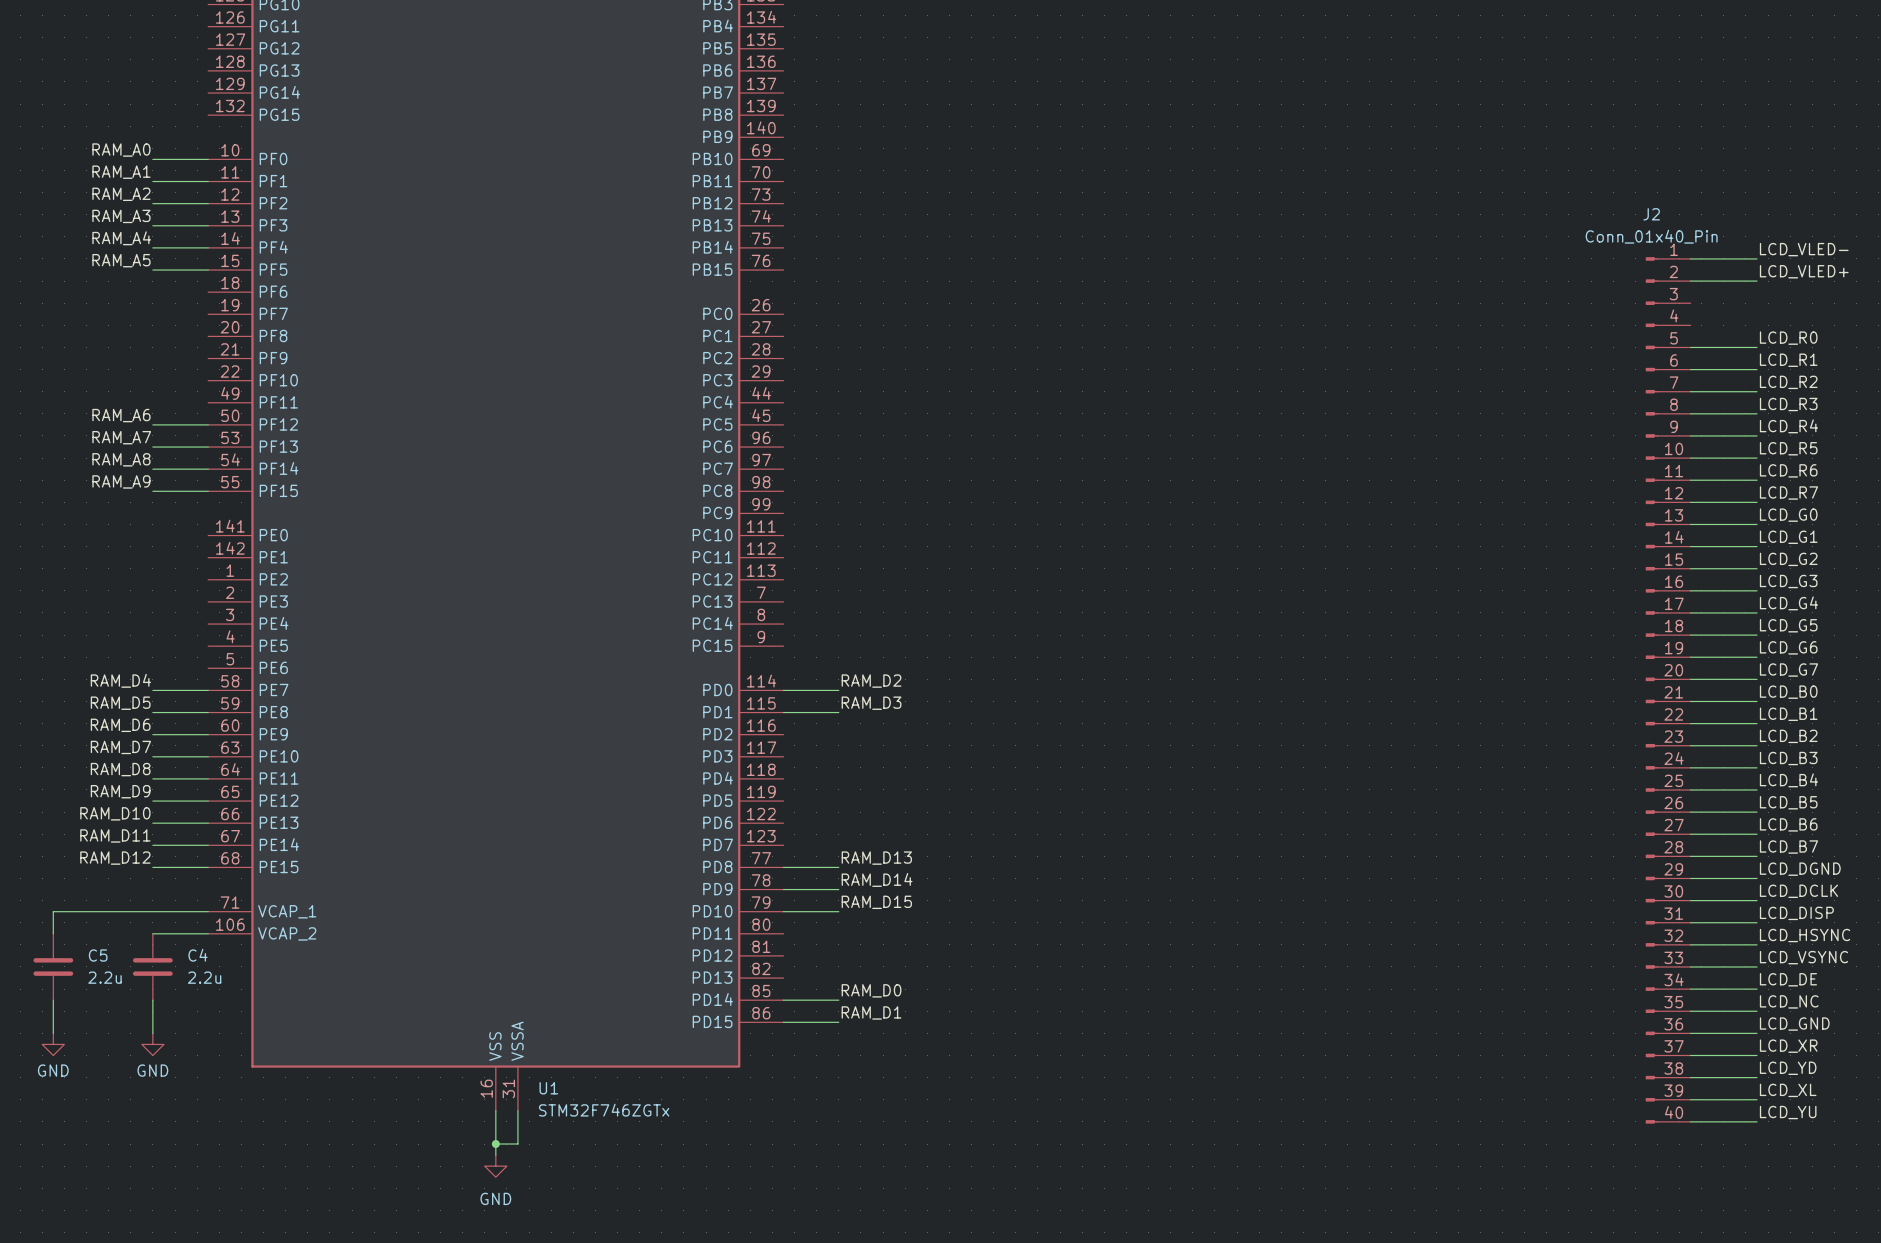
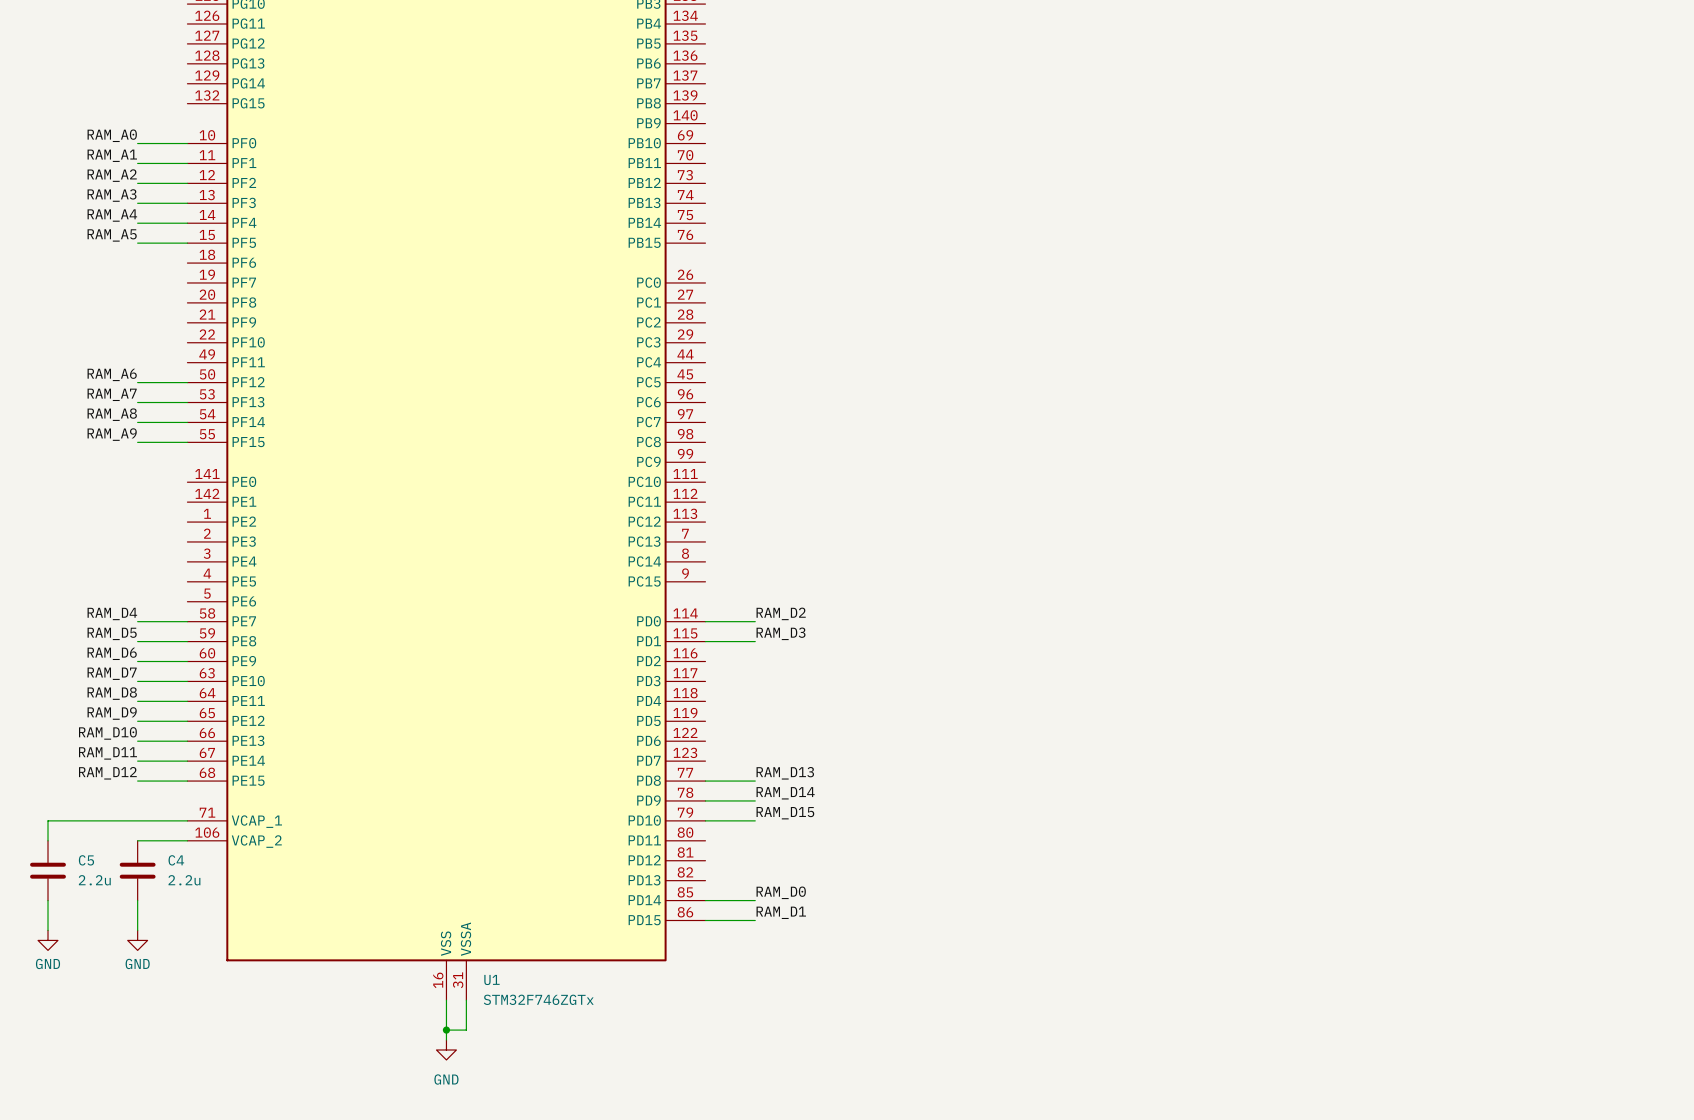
label: LCD_VLED- (1804, 249) -> none
wire: (1690, 258) (1757, 258) -> none
label: LCD_VLED+ (1804, 271) -> none
wire: (1690, 281) (1757, 281) -> none
label: LCD_R0 (1788, 338) -> none
wire: (1690, 347) (1757, 347) -> none
label: LCD_R1 (1788, 360) -> none
wire: (1690, 369) (1757, 369) -> none
label: LCD_R2 (1788, 382) -> none
wire: (1690, 391) (1757, 391) -> none
label: LCD_R3 (1788, 404) -> none
wire: (1690, 413) (1757, 413) -> none
label: LCD_R4 (1788, 426) -> none
wire: (1690, 435) (1757, 435) -> none
label: LCD_R5 (1788, 448) -> none
wire: (1690, 458) (1757, 458) -> none
label: LCD_R6 (1788, 470) -> none
wire: (1690, 480) (1757, 480) -> none
label: LCD_R7 (1788, 493) -> none
wire: (1690, 502) (1757, 502) -> none
label: LCD_G0 (1788, 515) -> none
wire: (1690, 524) (1757, 524) -> none
label: LCD_G1 (1788, 537) -> none
wire: (1690, 546) (1757, 546) -> none
label: LCD_G2 (1788, 559) -> none
wire: (1690, 568) (1757, 568) -> none
label: LCD_G3 (1788, 581) -> none
wire: (1690, 590) (1757, 590) -> none
label: LCD_G4 (1788, 603) -> none
wire: (1690, 612) (1757, 612) -> none
label: LCD_G5 (1788, 625) -> none
wire: (1690, 635) (1757, 635) -> none
label: LCD_G6 (1788, 647) -> none
wire: (1690, 657) (1757, 657) -> none
label: LCD_G7 (1788, 670) -> none
wire: (1690, 679) (1757, 679) -> none
J2: Conn_01x40_Pin (1668, 690) -> none
label: LCD_B0 (1788, 692) -> none
wire: (1690, 701) (1757, 701) -> none
label: LCD_B1 (1788, 714) -> none
wire: (1690, 723) (1757, 723) -> none
label: LCD_B2 (1788, 736) -> none
wire: (1690, 745) (1757, 745) -> none
label: LCD_B3 (1788, 758) -> none
wire: (1690, 767) (1757, 767) -> none
label: LCD_B4 (1788, 780) -> none
wire: (1690, 789) (1757, 789) -> none
label: LCD_B5 (1788, 802) -> none
wire: (1690, 812) (1757, 812) -> none
label: LCD_B6 (1788, 824) -> none
wire: (1690, 834) (1757, 834) -> none
label: LCD_B7 (1788, 847) -> none
wire: (1690, 856) (1757, 856) -> none
label: LCD_DGND (1800, 869) -> none
wire: (1690, 878) (1757, 878) -> none
label: LCD_DCLK (1798, 891) -> none
wire: (1690, 900) (1757, 900) -> none
label: LCD_DISP (1796, 913) -> none
wire: (1690, 922) (1757, 922) -> none
label: LCD_HSYNC (1805, 935) -> none
wire: (1690, 944) (1757, 944) -> none
label: LCD_VSYNC (1803, 957) -> none
wire: (1690, 966) (1757, 966) -> none
label: LCD_DE (1788, 979) -> none
wire: (1690, 989) (1757, 989) -> none
label: LCD_NC (1789, 1001) -> none
wire: (1690, 1011) (1757, 1011) -> none
label: LCD_GND (1794, 1024) -> none
wire: (1690, 1033) (1757, 1033) -> none
label: LCD_XR (1788, 1046) -> none
wire: (1690, 1055) (1757, 1055) -> none
label: LCD_YD (1788, 1068) -> none
wire: (1690, 1077) (1757, 1077) -> none
label: LCD_XL (1788, 1090) -> none
wire: (1690, 1099) (1757, 1099) -> none
label: LCD_YU (1788, 1112) -> none
wire: (1690, 1121) (1757, 1121) -> none

